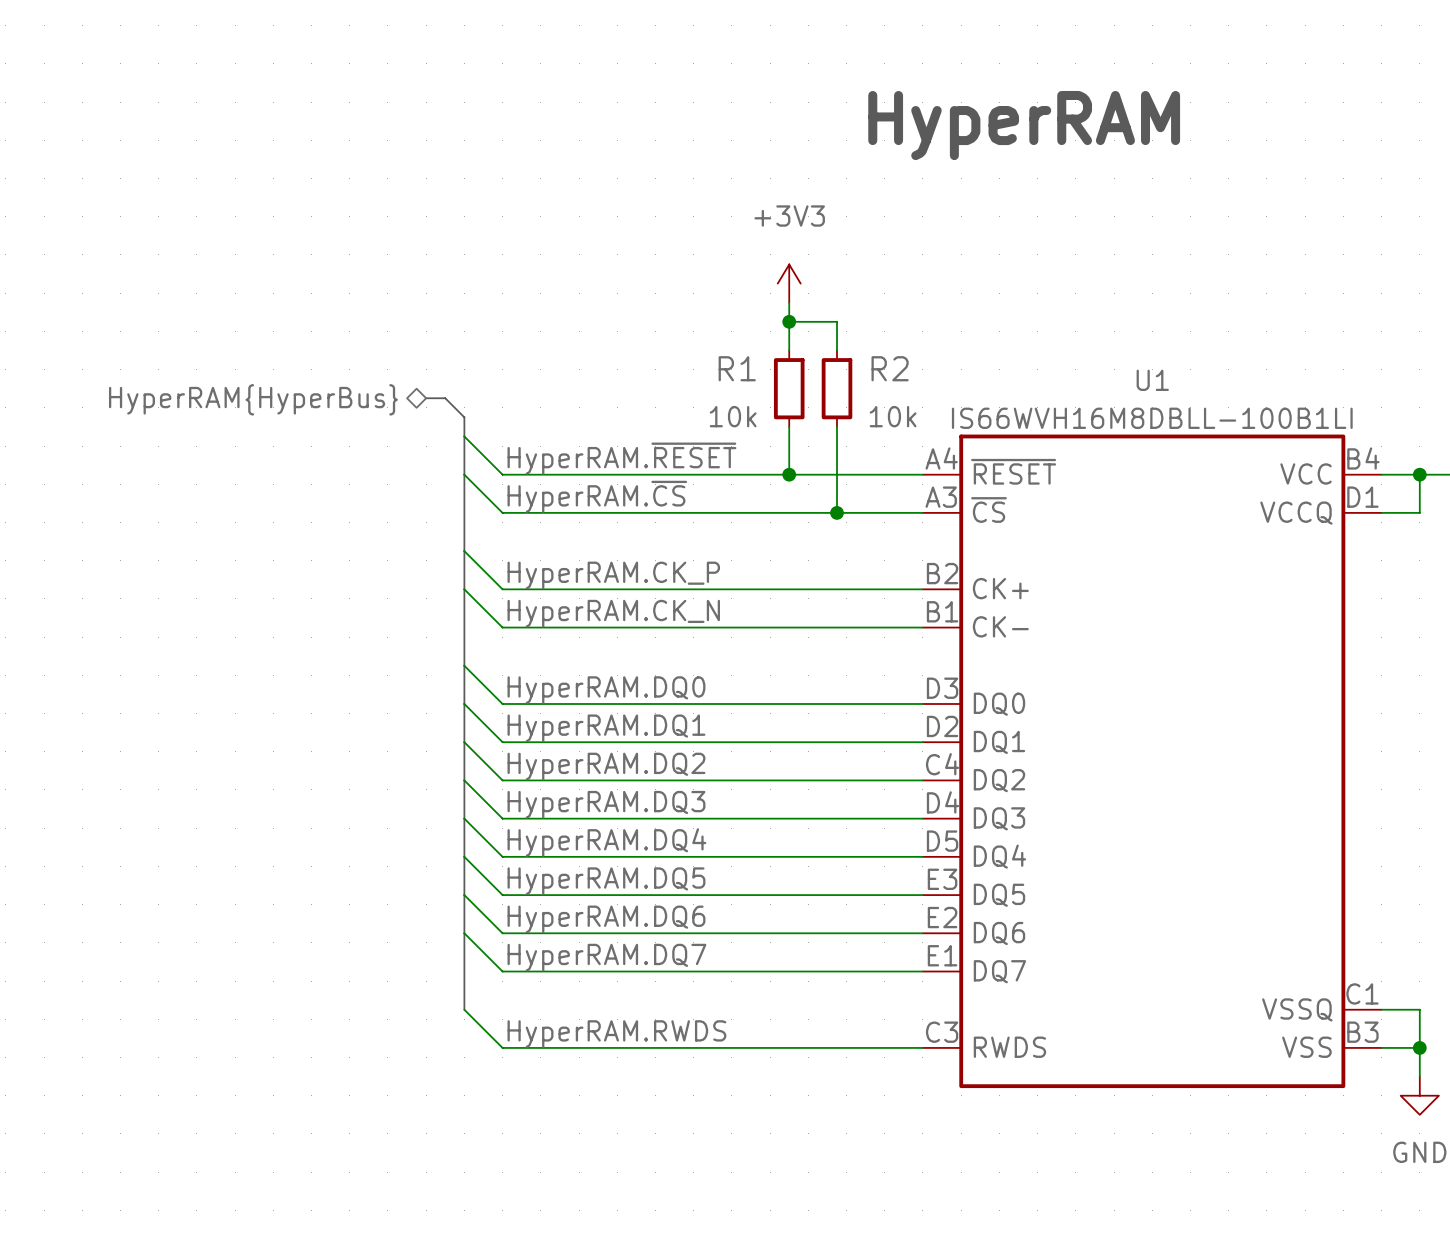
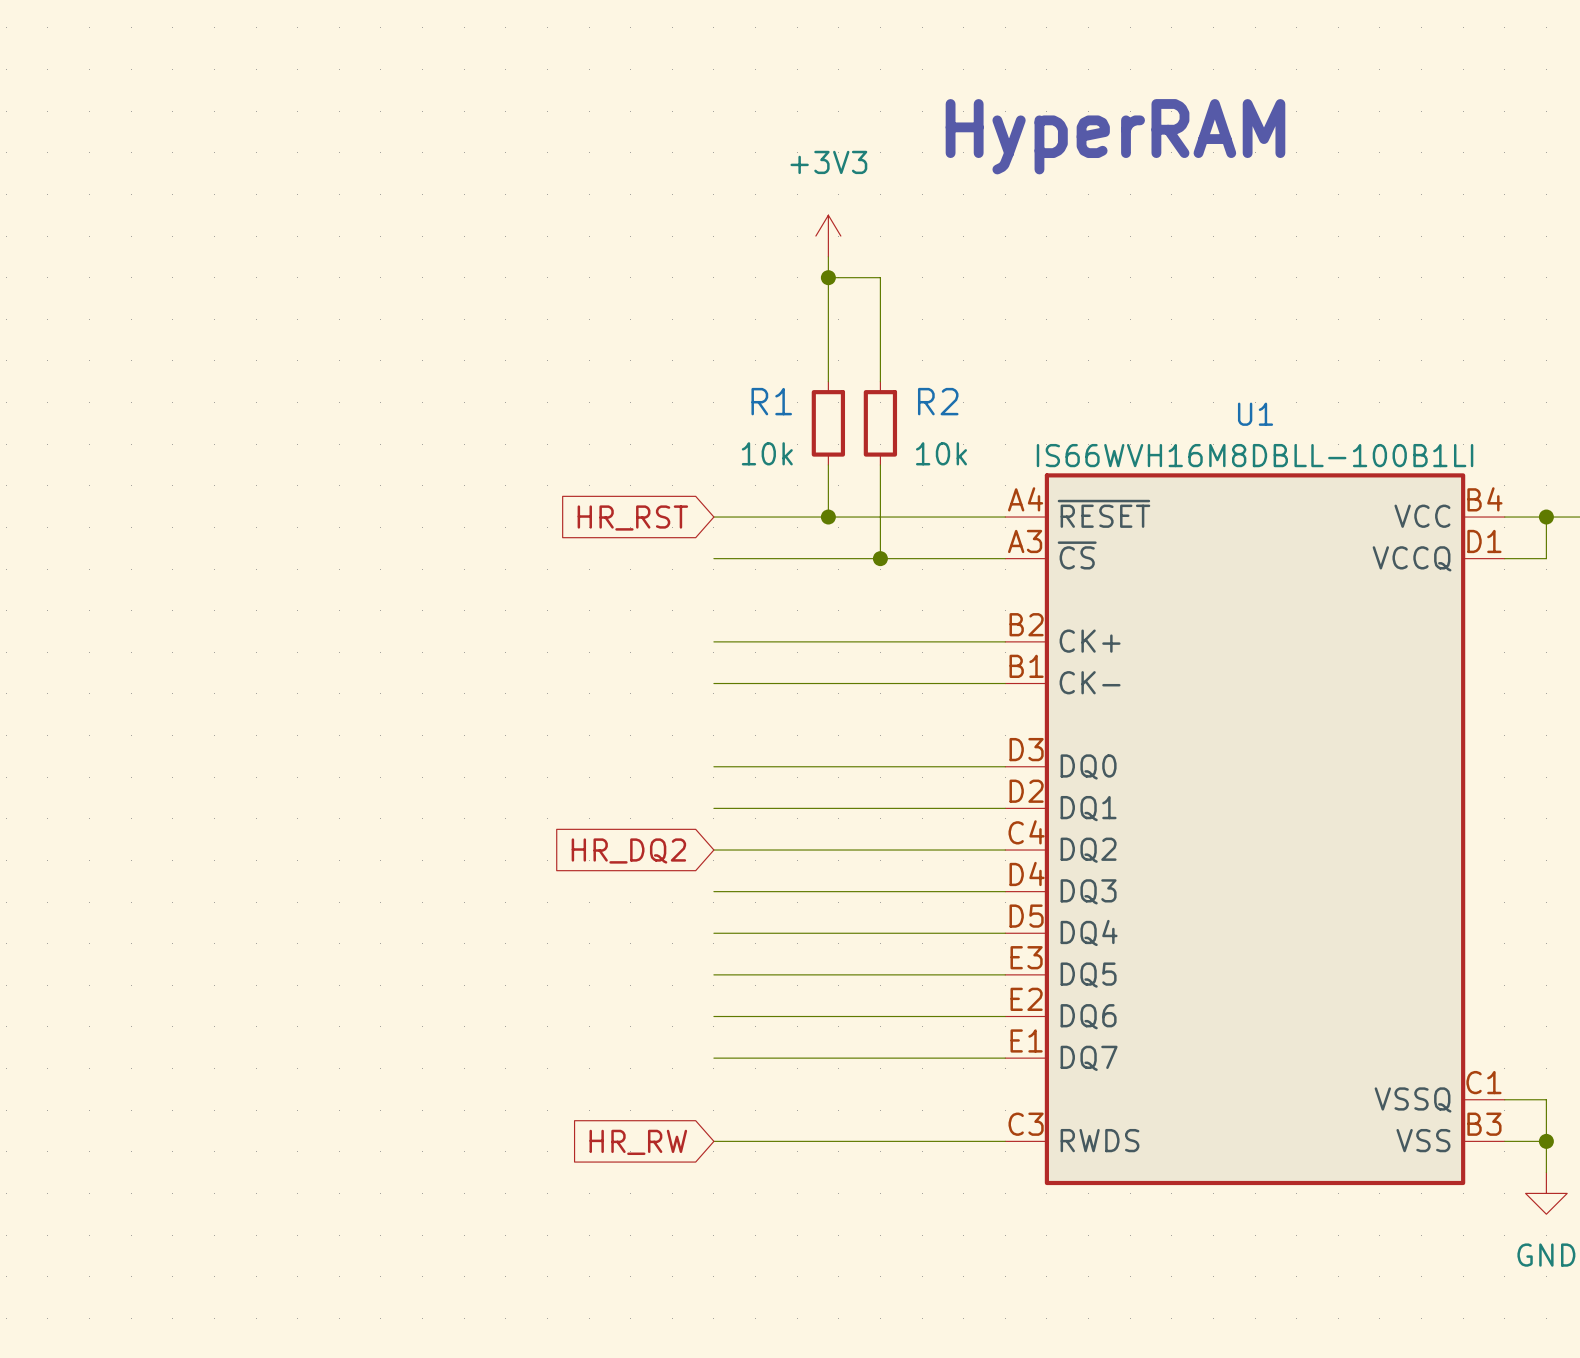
wire: none -> (828, 256) (828, 381)
wire: none -> (828, 277) (880, 277) (880, 381)
power symbol position: +3V3 (789, 283) -> +3V3 (828, 236)
wire: (789, 302) (789, 350) -> none
wire: (789, 321) (837, 321) (837, 350) -> none
junction position: (789, 321) -> (828, 277)
R1 position: (789, 388) -> (828, 423)
R2 position: (837, 388) -> (880, 423)
bus: (426, 398) (445, 398) (464, 417) (464, 1009) -> none
hierarchical label: HyperRAM{HyperBus} (253, 399) -> none
wire: (789, 426) (789, 474) -> (828, 464) (828, 517)
wire: (837, 426) (837, 512) -> (880, 464) (880, 558)
wire: (464, 436) (502, 474) -> none
label: HyperRAM.~{RESET} (621, 458) -> none
wire: (464, 474) (502, 512) (655, 512) -> none
wire: (502, 474) (655, 474) -> none
junction: none -> (828, 517)
junction: (789, 474) -> none
global label: none -> HR_RST (632, 518)
label: HyperRAM.~{CS} (597, 496) -> none
junction: none -> (880, 558)
junction: (837, 512) -> none
wire: (464, 551) (502, 589) -> none
label: HyperRAM.CK_P (613, 575) -> none
wire: (464, 589) (502, 627) (655, 627) -> none
wire: (502, 589) (655, 589) -> none
label: HyperRAM.CK_N (613, 613) -> none
wire: (464, 665) (502, 703) (655, 703) -> none
label: HyperRAM.DQ0 (606, 690) -> none
wire: (464, 703) (502, 742) -> none
label: HyperRAM.DQ1 (606, 728) -> none
wire: (464, 742) (502, 780) (655, 780) -> none
wire: (502, 742) (655, 742) -> none
label: HyperRAM.DQ2 (606, 766) -> none
wire: (464, 780) (502, 818) (655, 818) -> none
global label: none -> HR_DQ2 (628, 851)
label: HyperRAM.DQ3 (606, 804) -> none
wire: (464, 818) (502, 856) (655, 856) -> none
label: HyperRAM.DQ4 (606, 842) -> none
wire: (464, 856) (502, 895) -> none
label: HyperRAM.DQ5 (606, 881) -> none
wire: (464, 895) (502, 933) (655, 933) -> none
wire: (502, 895) (655, 895) -> none
label: HyperRAM.DQ6 (606, 919) -> none
wire: (464, 933) (502, 971) (655, 971) -> none
label: HyperRAM.DQ7 (606, 957) -> none
wire: (464, 1009) (502, 1047) (655, 1047) -> none
label: HyperRAM.RWDS (616, 1034) -> none
global label: none -> HR_RW (638, 1142)

